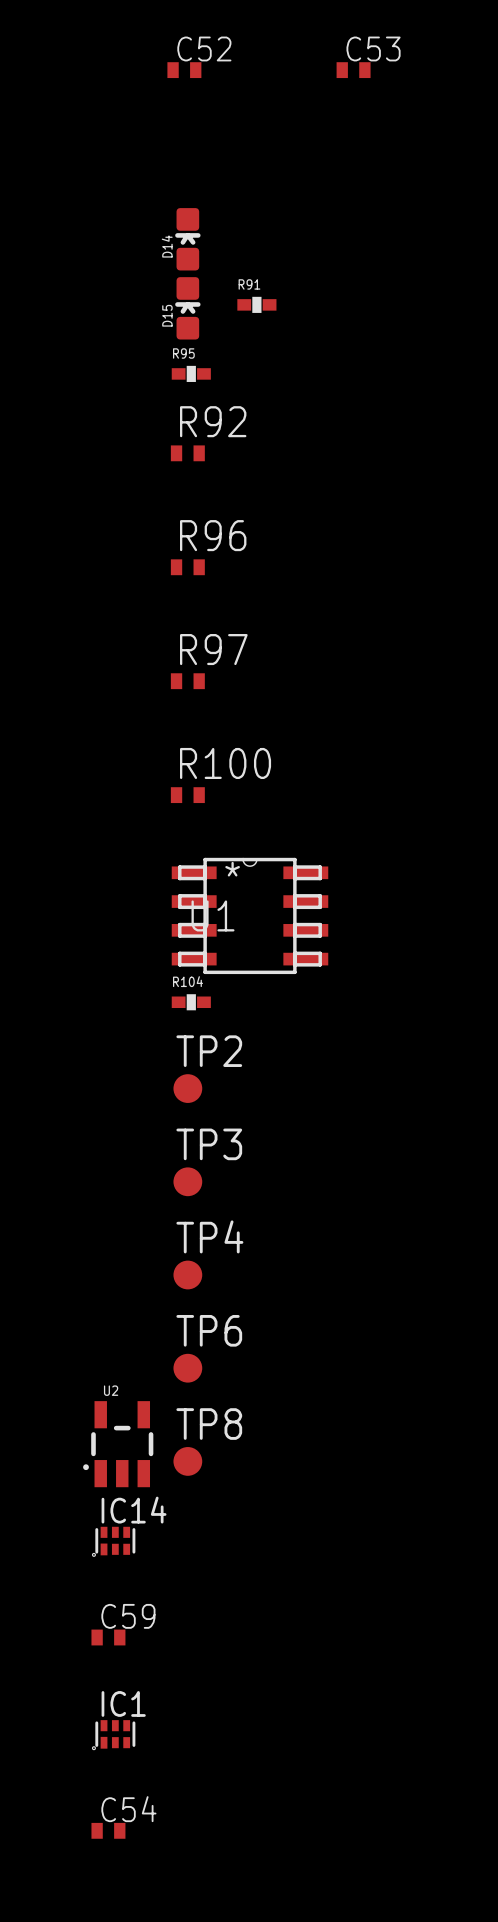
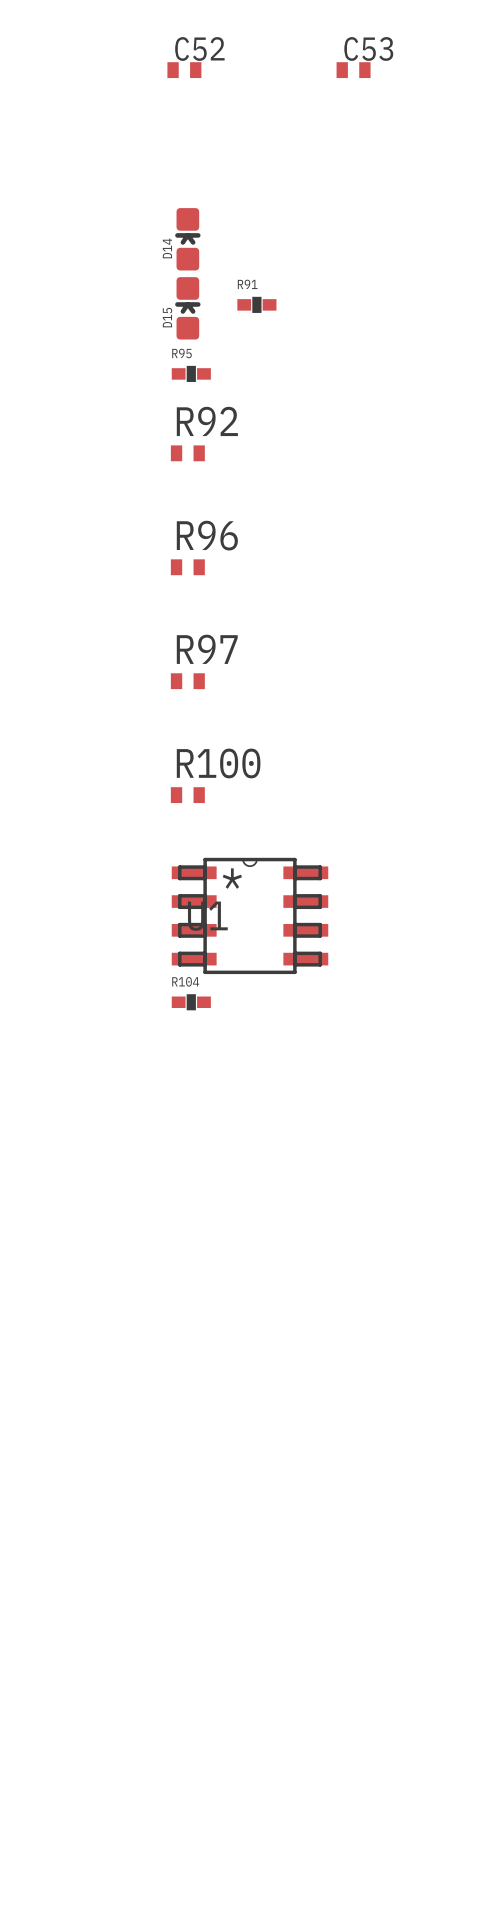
TP2: (187, 1088) -> none
TP3: (187, 1181) -> none
TP4: (187, 1274) -> none
TP6: (187, 1368) -> none
U2: (118, 1444) -> none
TP8: (187, 1461) -> none
IC14: (113, 1541) -> none
C59: (108, 1637) -> none
IC1: (113, 1735) -> none
C54: (108, 1830) -> none

